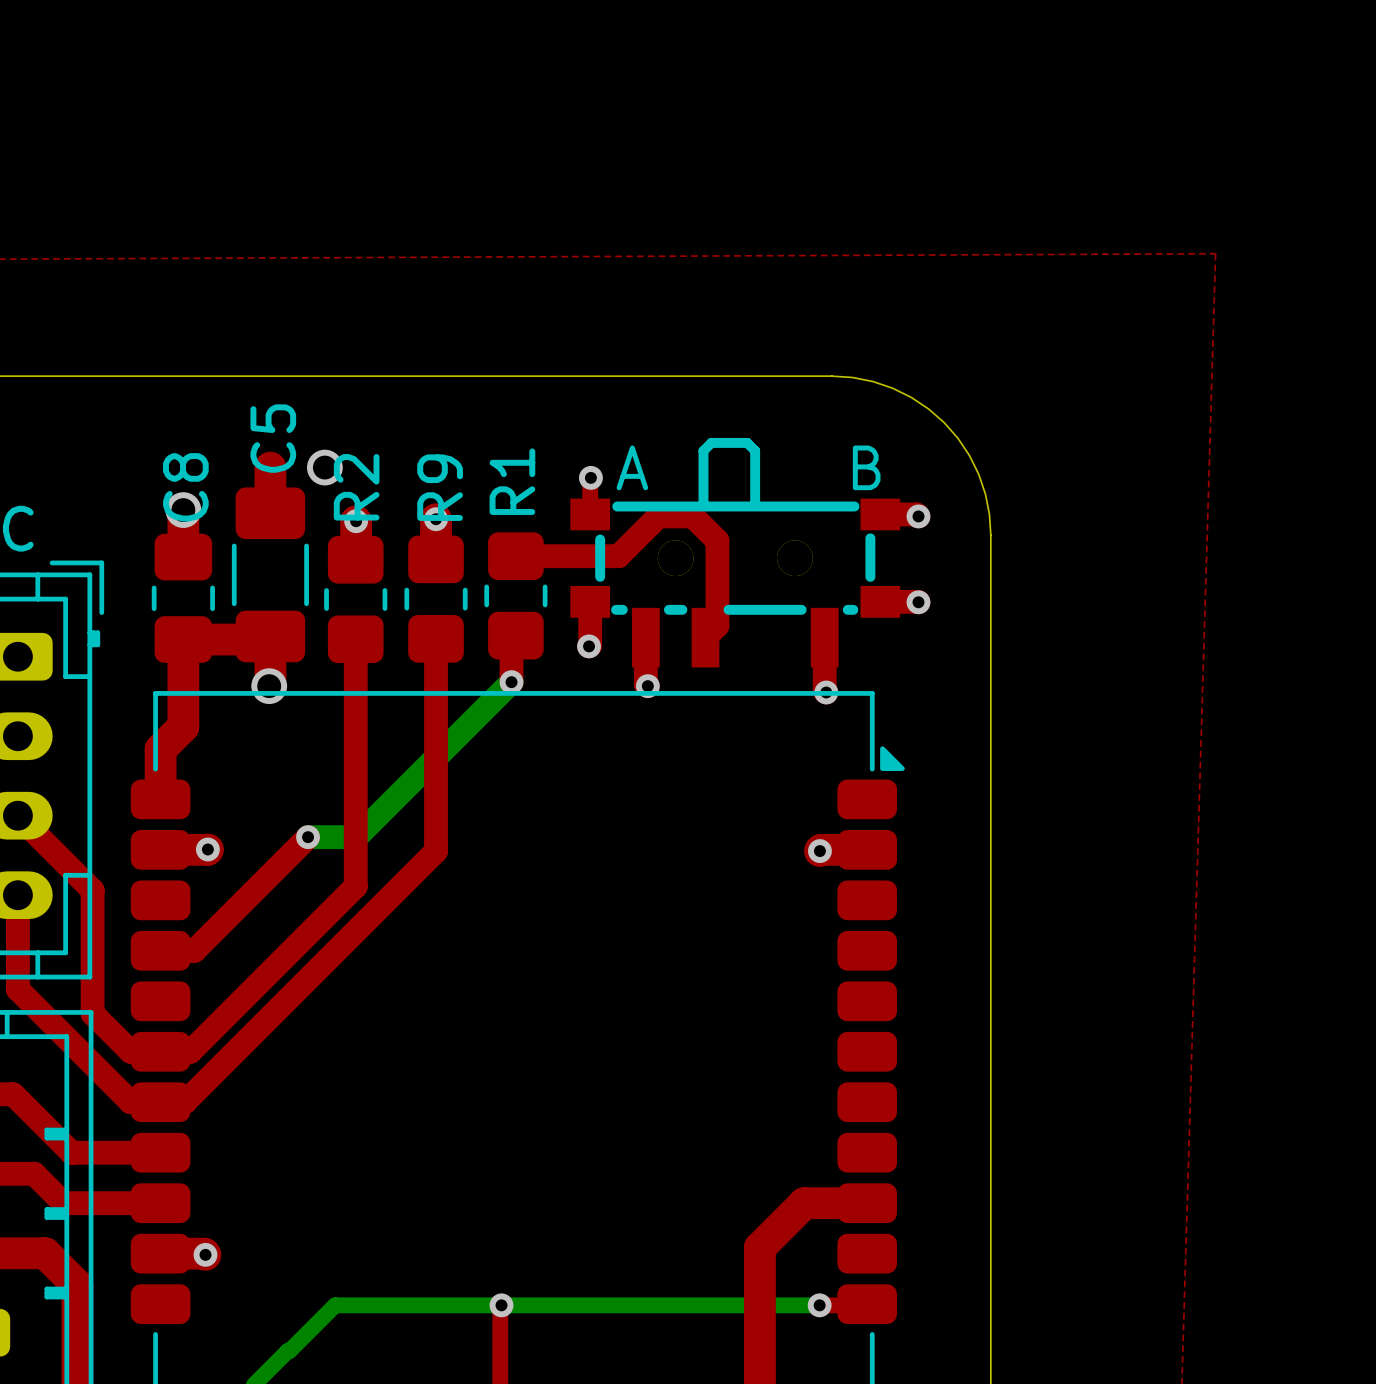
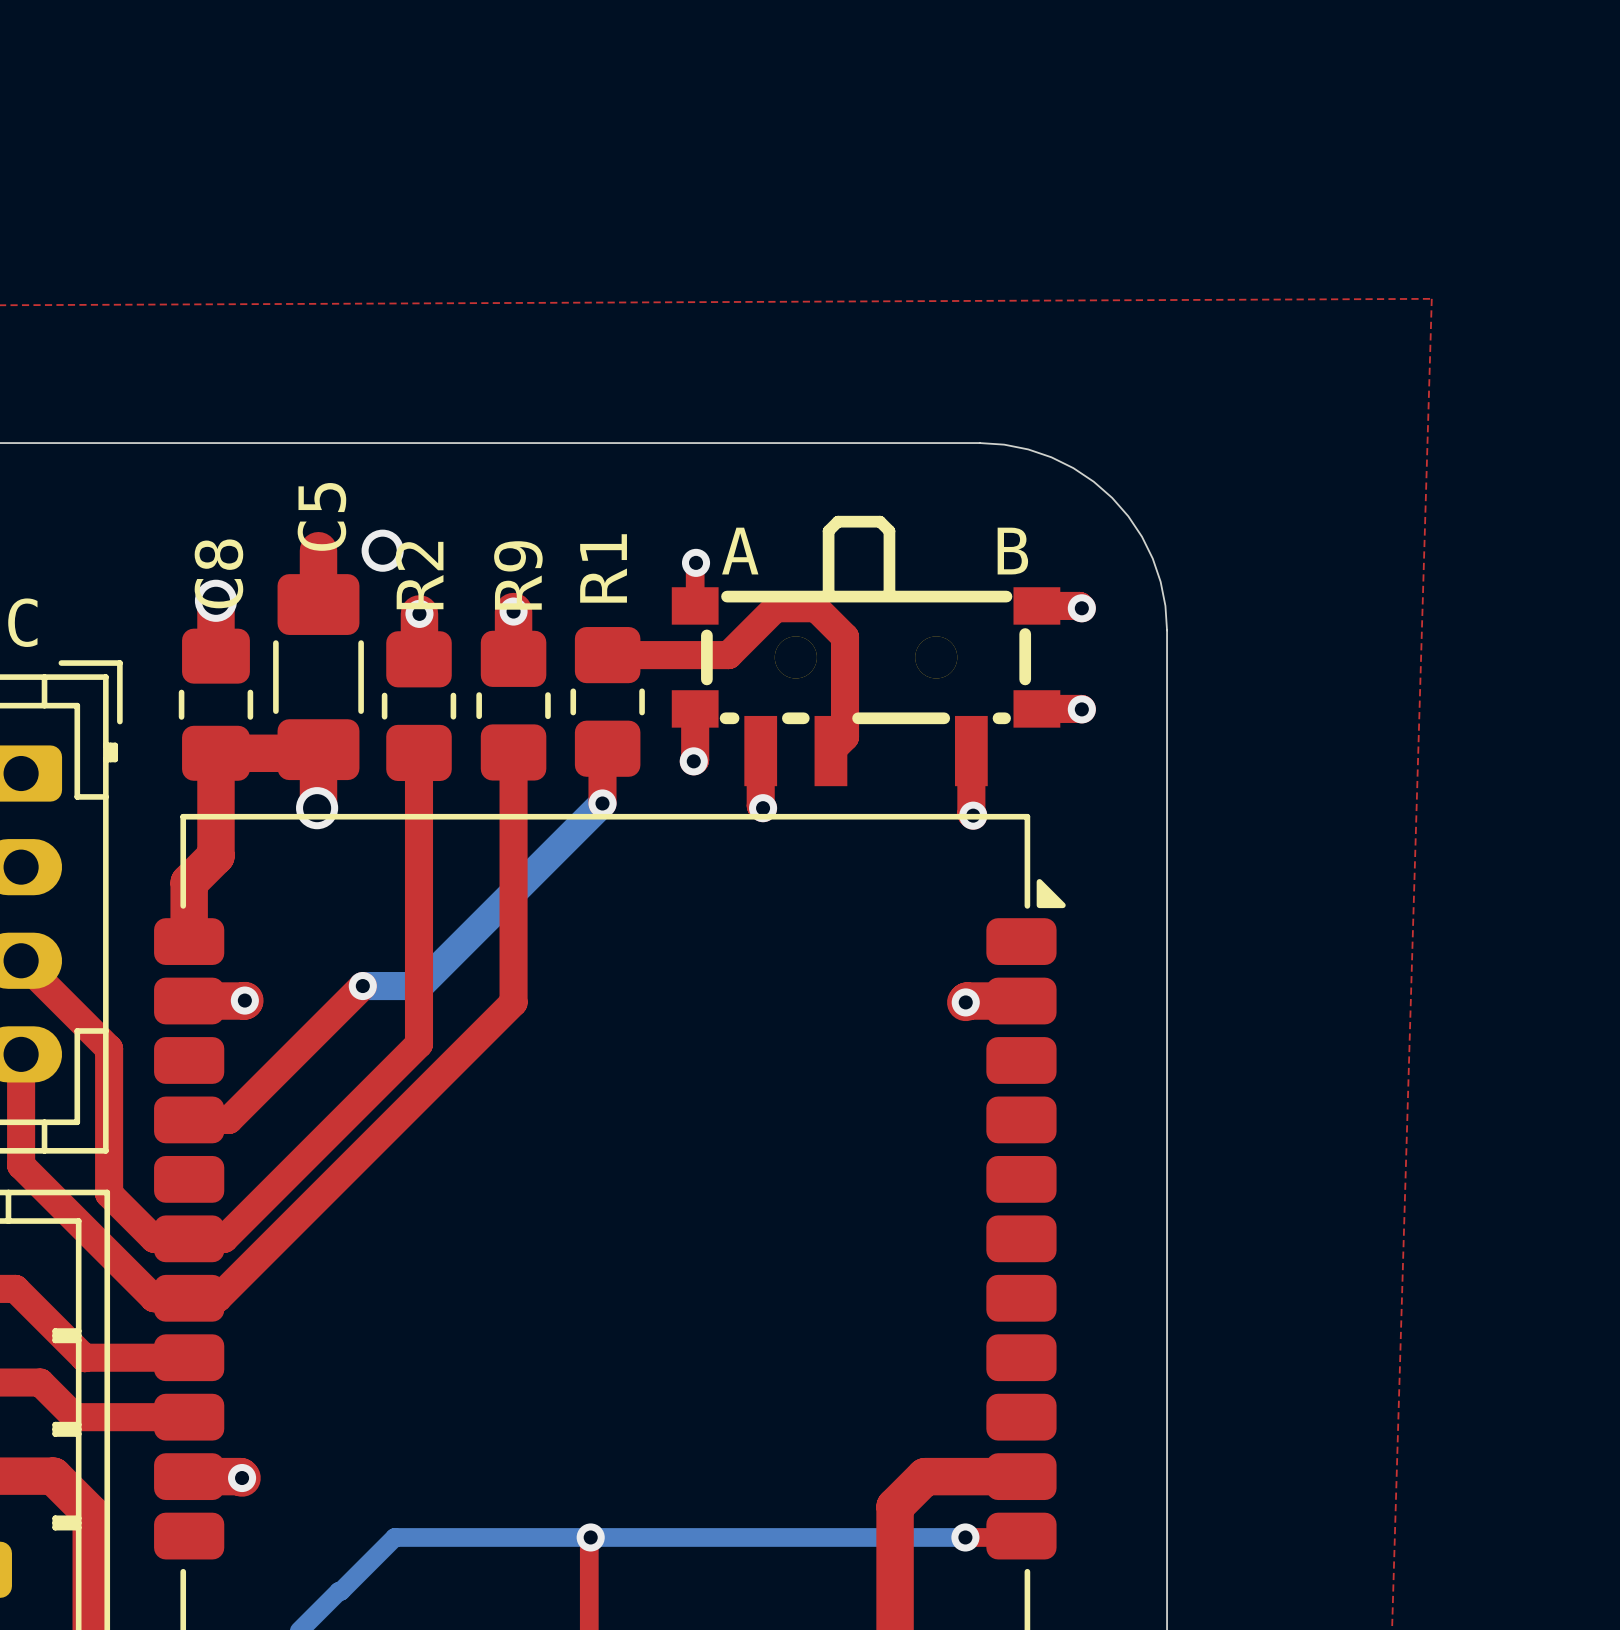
top track: (867, 1203) (804, 1203) (759, 1247) (759, 1279) -> (1021, 1476) (925, 1476) (895, 1506)

